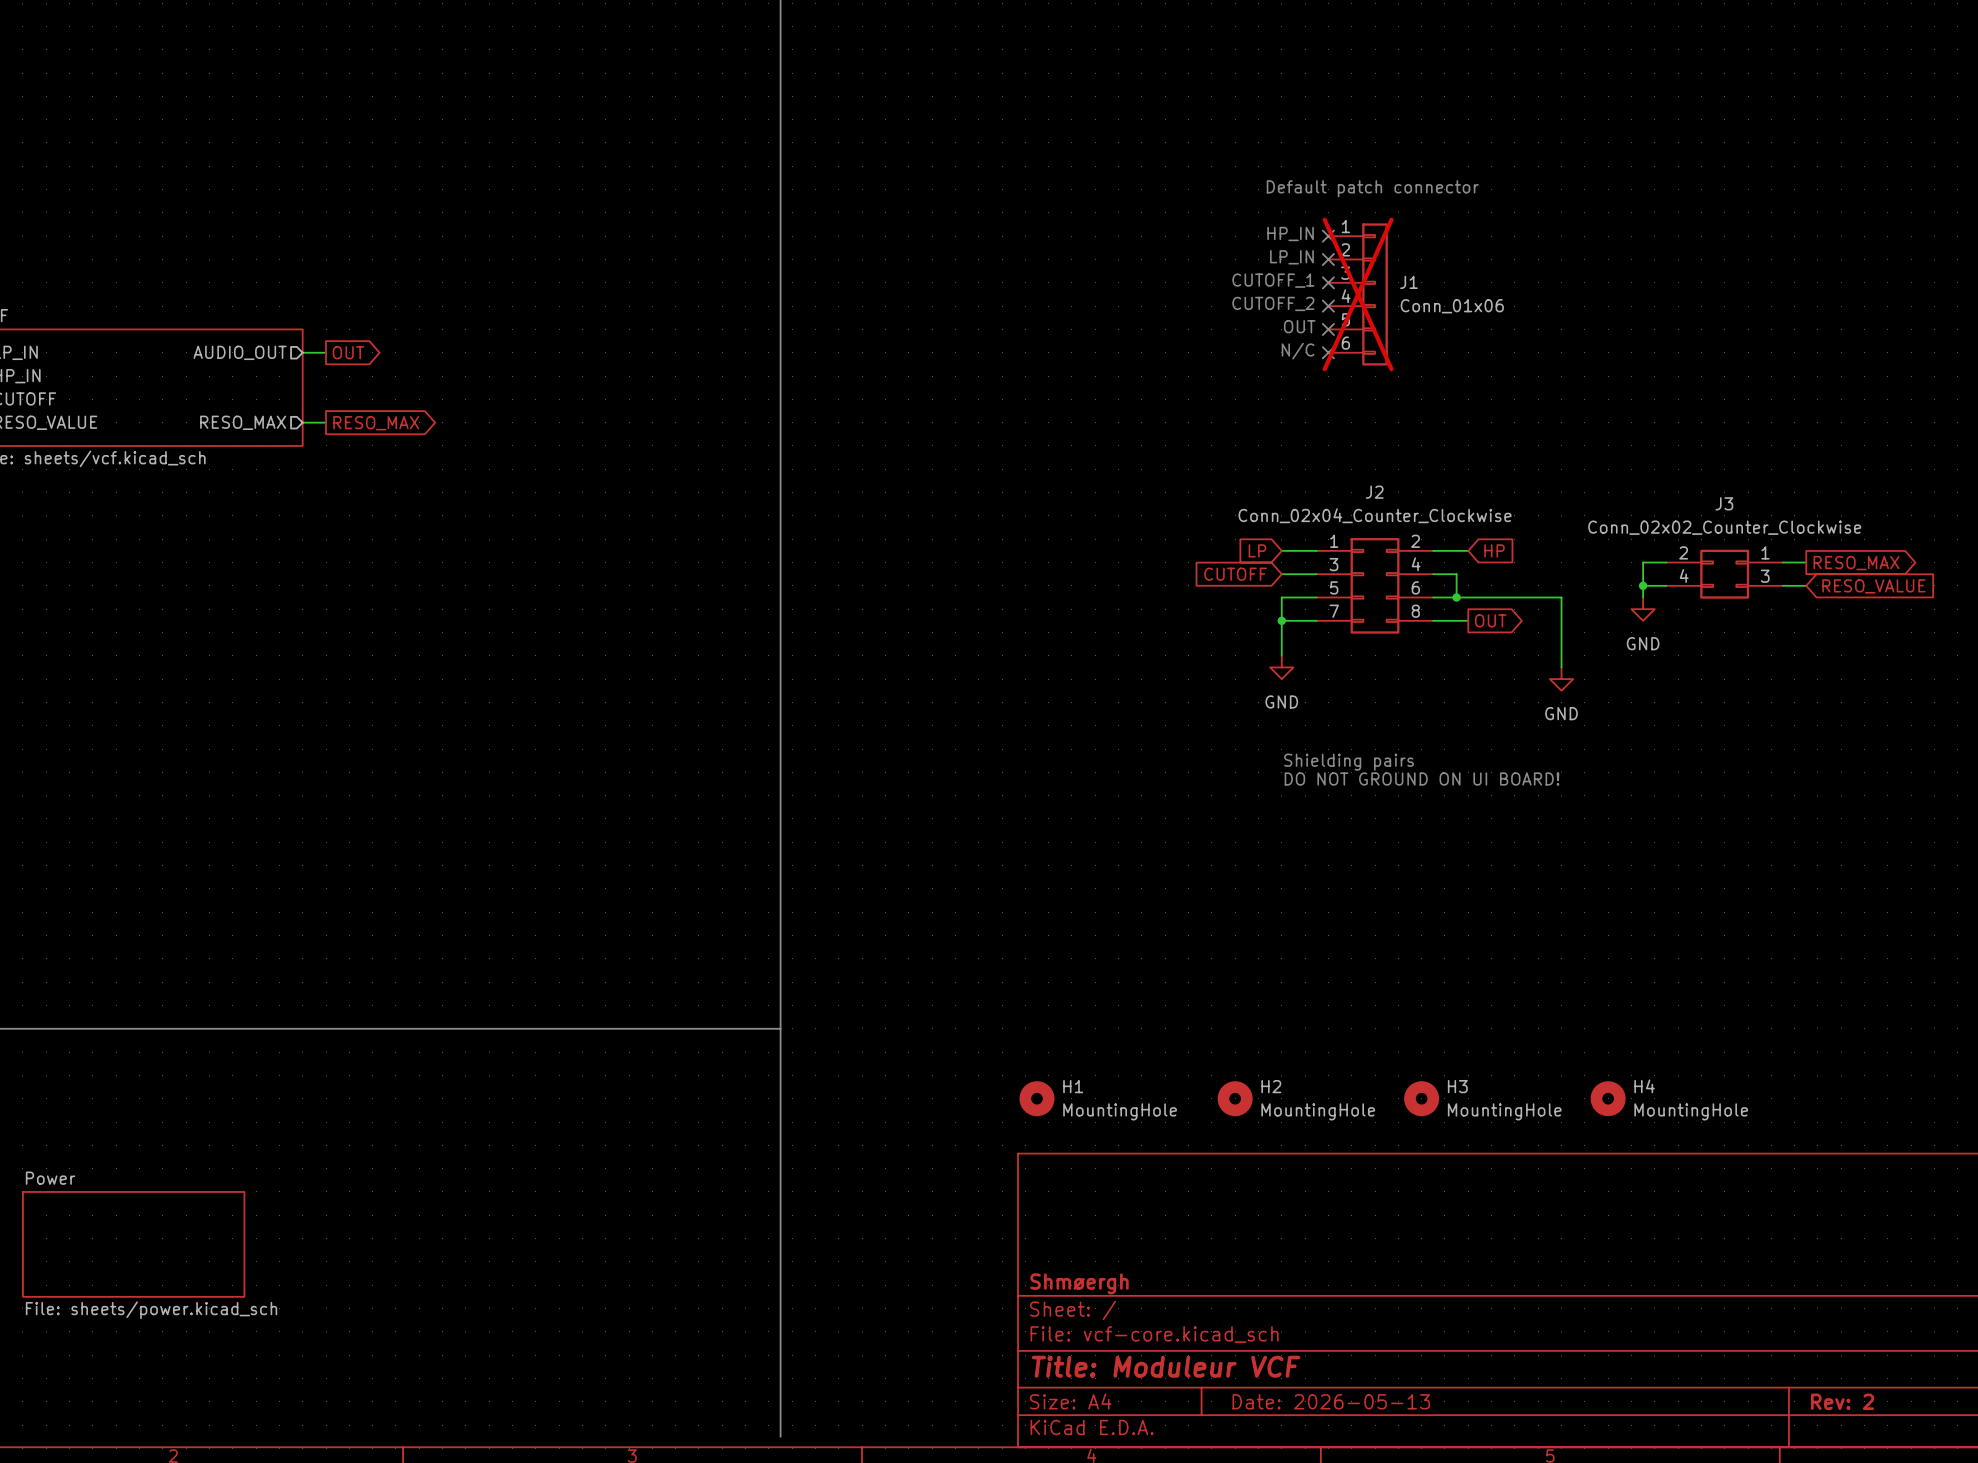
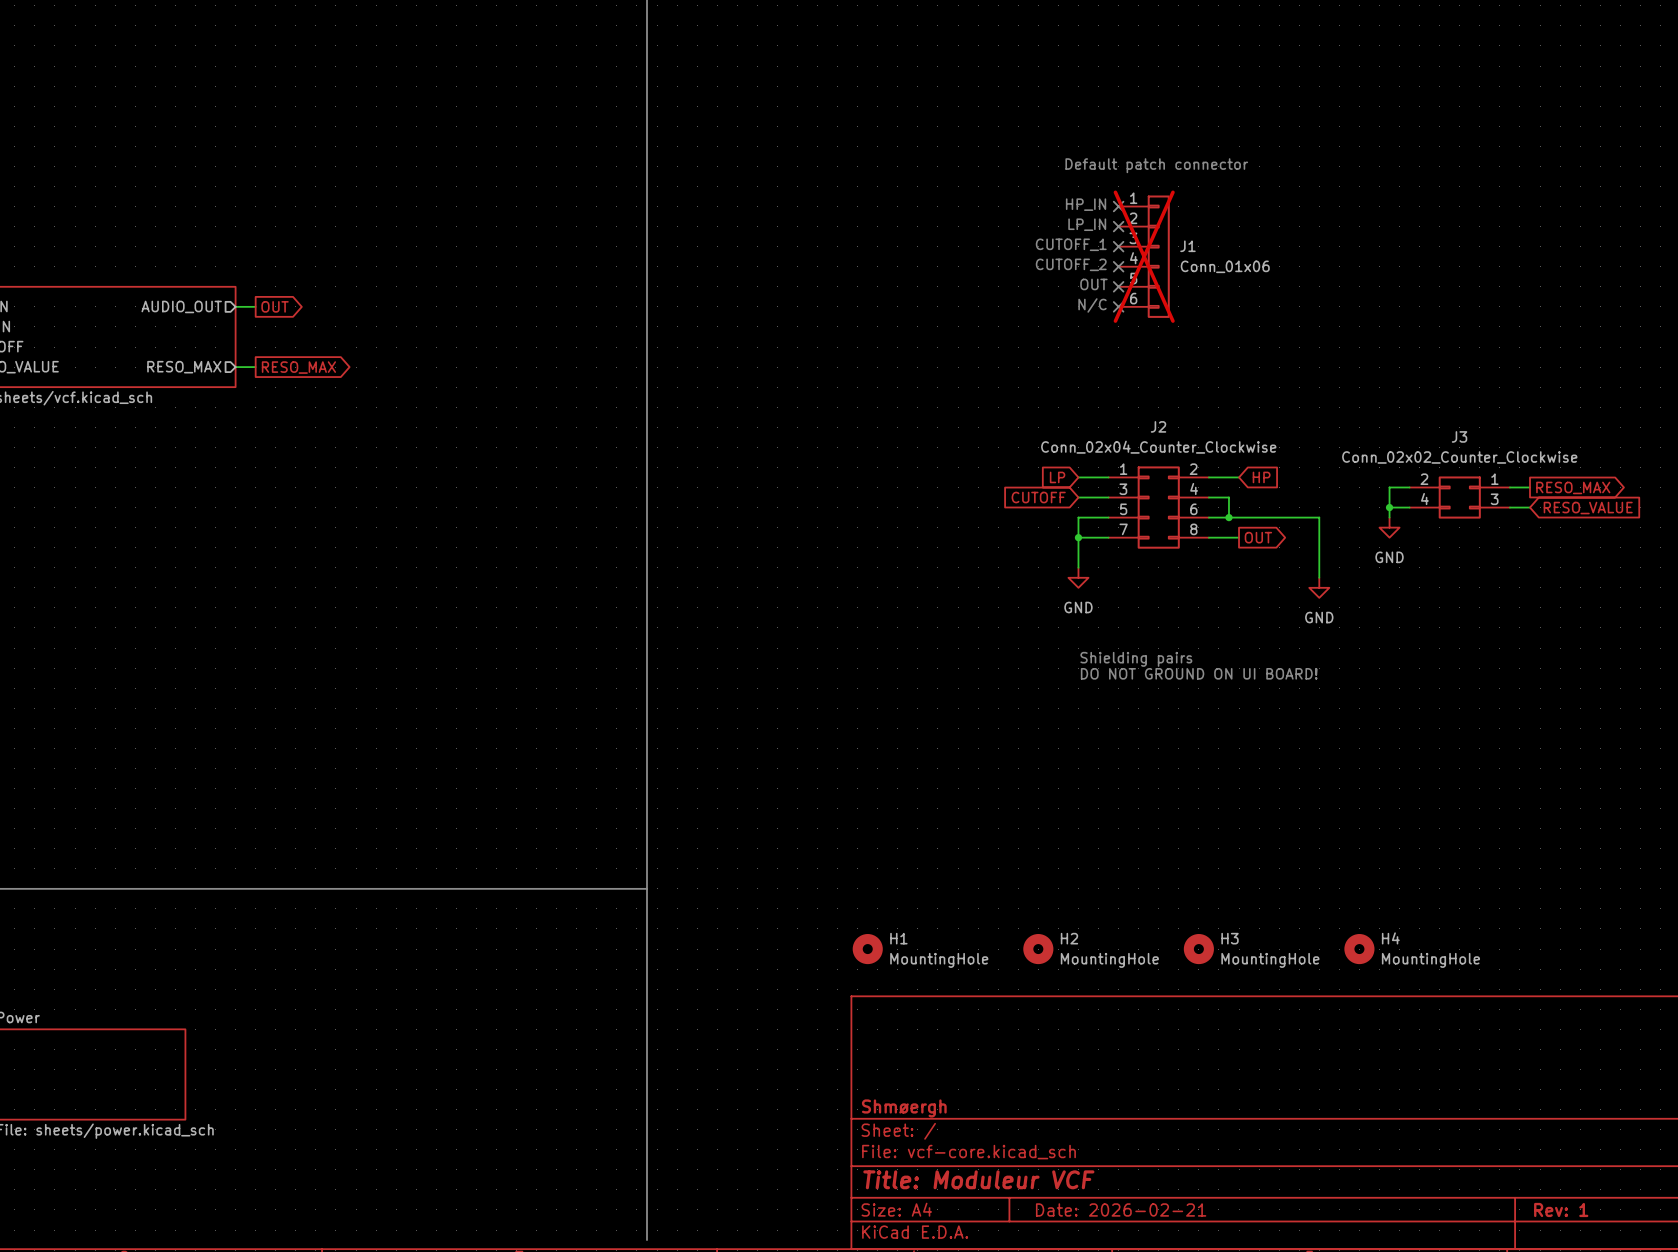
title block: Date: 2026-05-13 (1331, 1401) -> Date: 2026-02-21 (1121, 1209)
title block: Rev: 2 (1842, 1401) -> Rev: 1 (1561, 1209)

